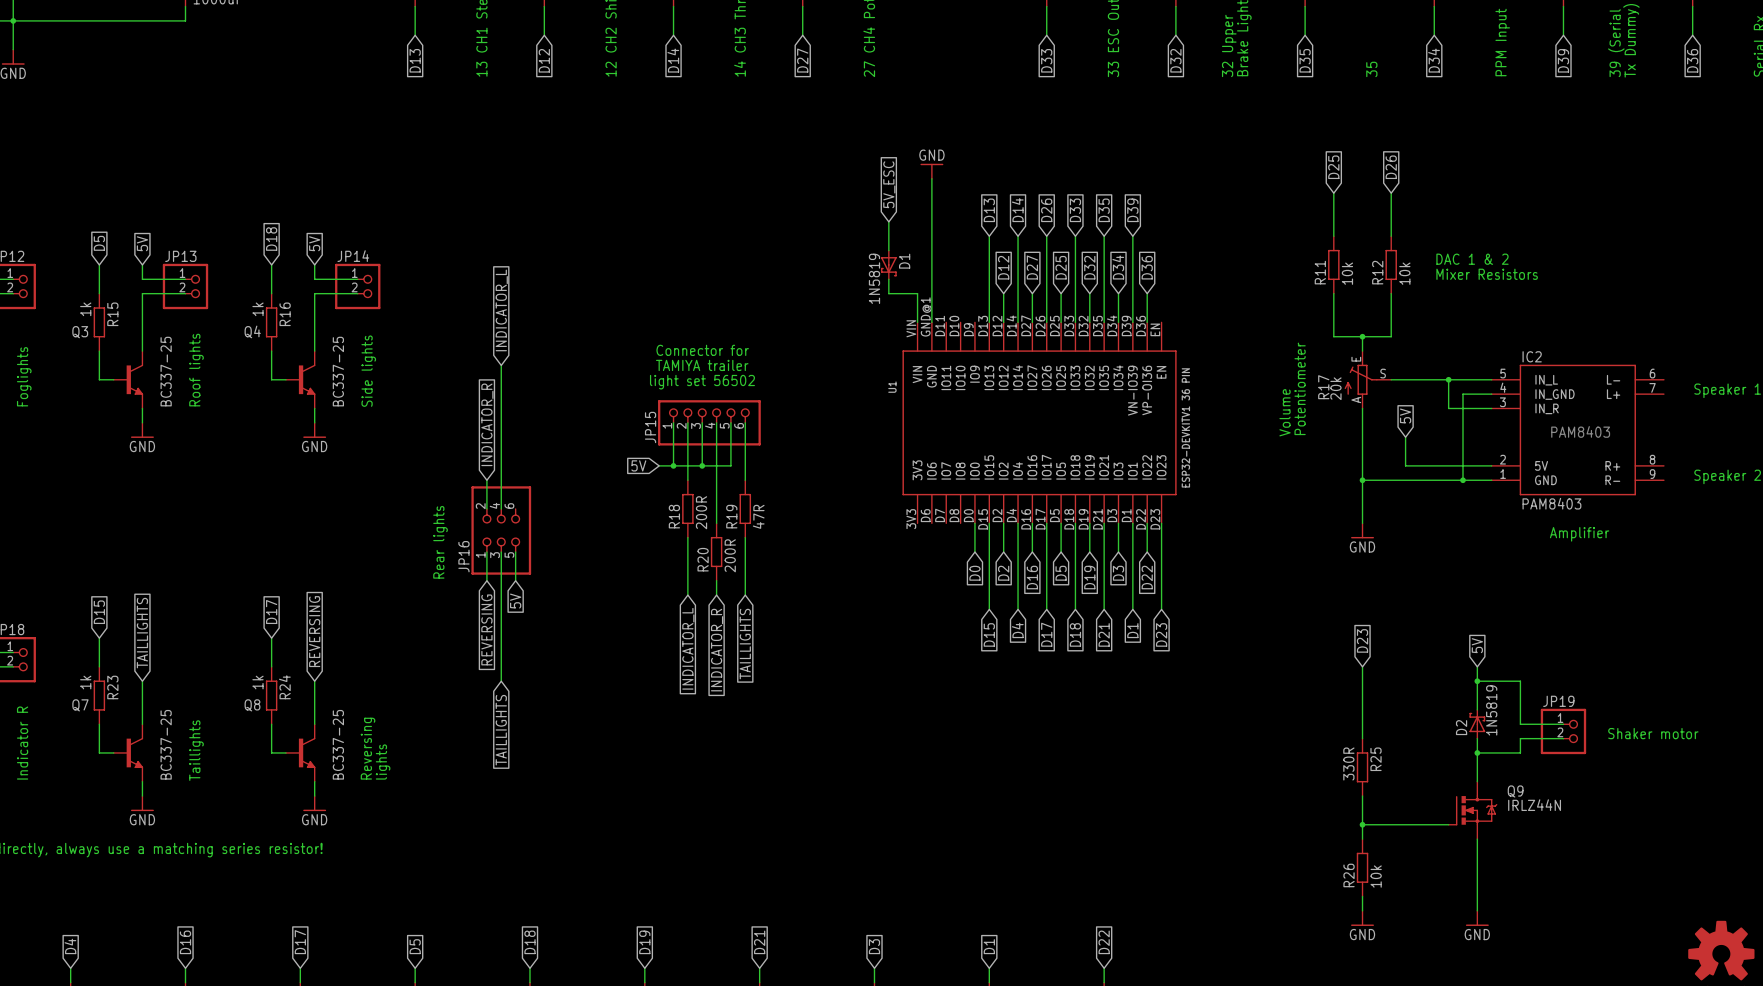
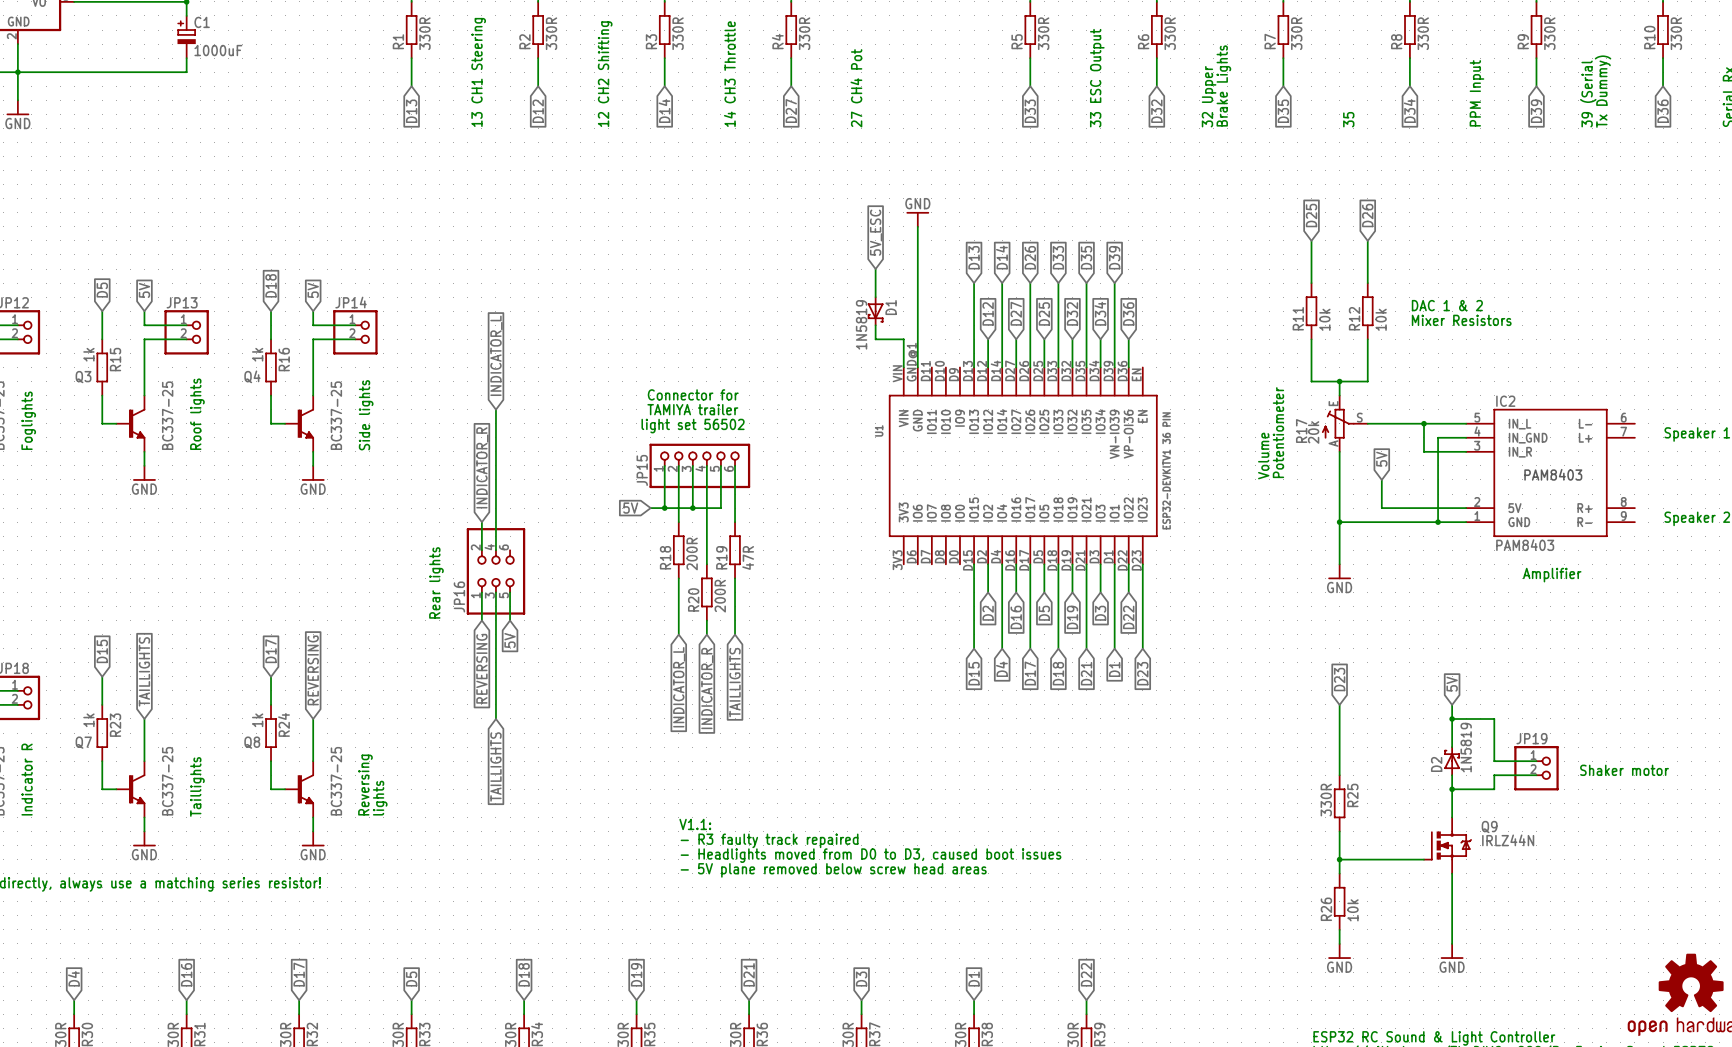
wire: (974, 523) (974, 552) -> none
global label: D0 (974, 573) -> none
text: none -> V1.1: (695, 824)
text: none -> - R3 faulty track repaired (769, 840)
text: none -> - Headlights moved from D0 to D3, caused boot issues (871, 855)
text: none -> - 5V plane removed below screw head areas (833, 870)

